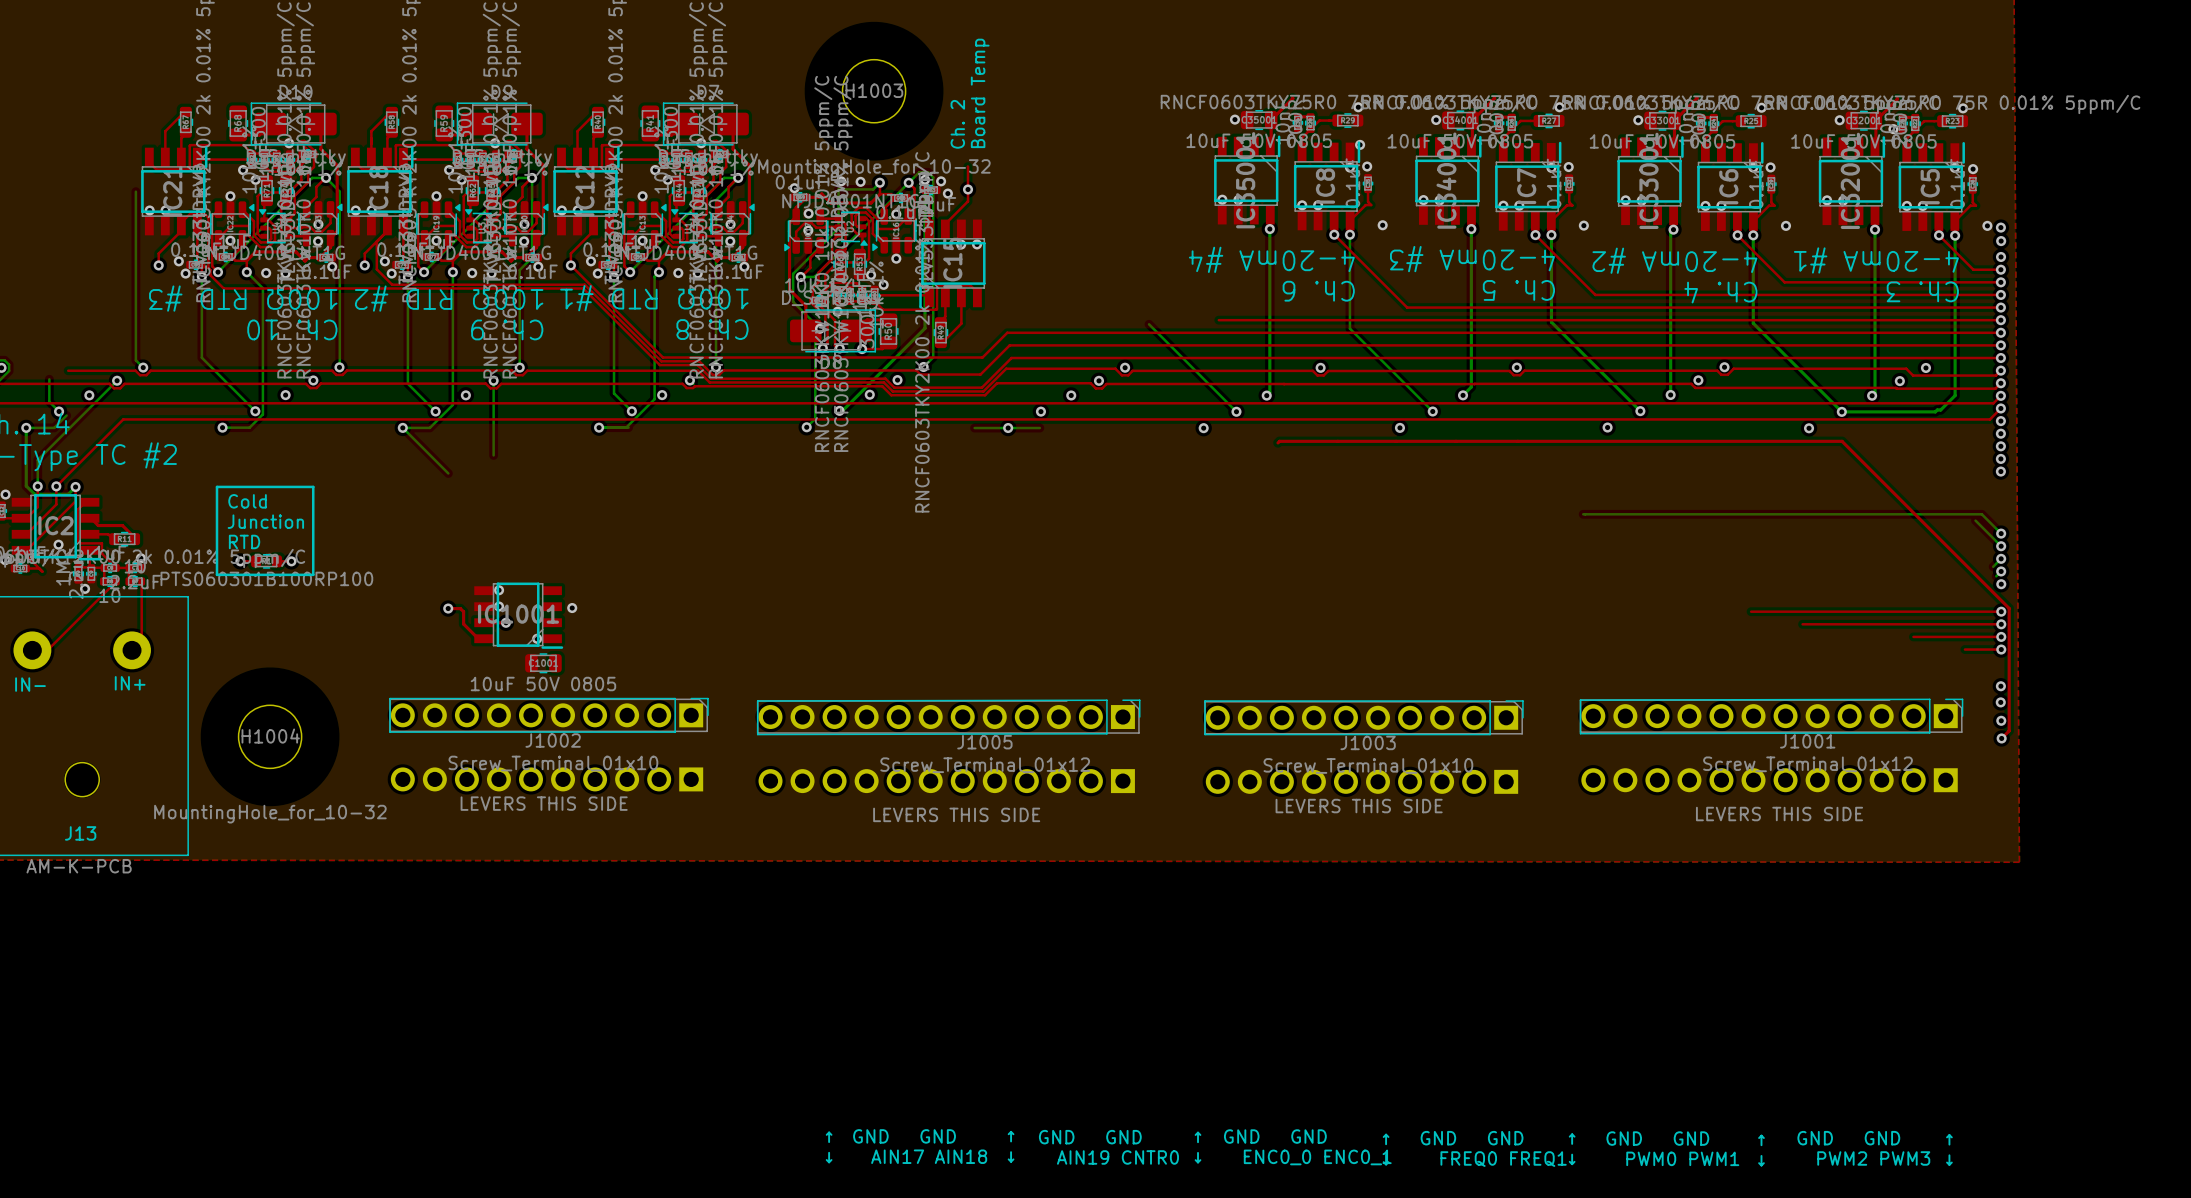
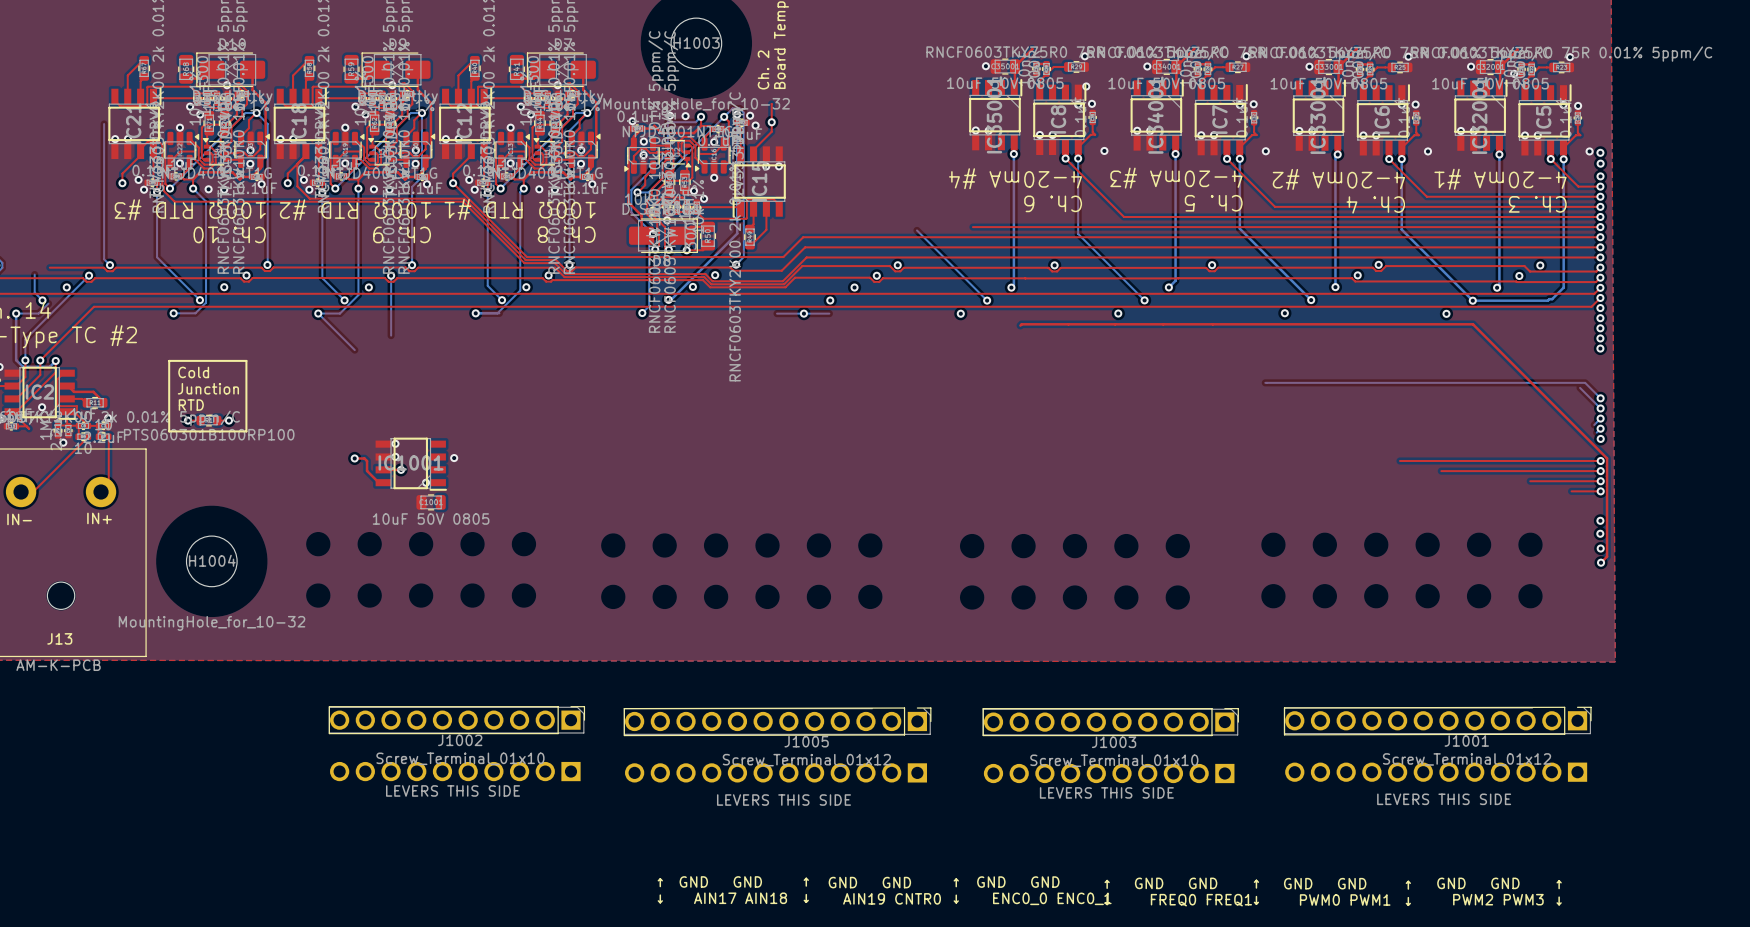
J1002 position: (549, 744) -> (456, 743)
J1001 position: (1771, 745) -> (1437, 744)
J1005 position: (948, 746) -> (777, 744)
J1003 position: (1363, 747) -> (1110, 745)

